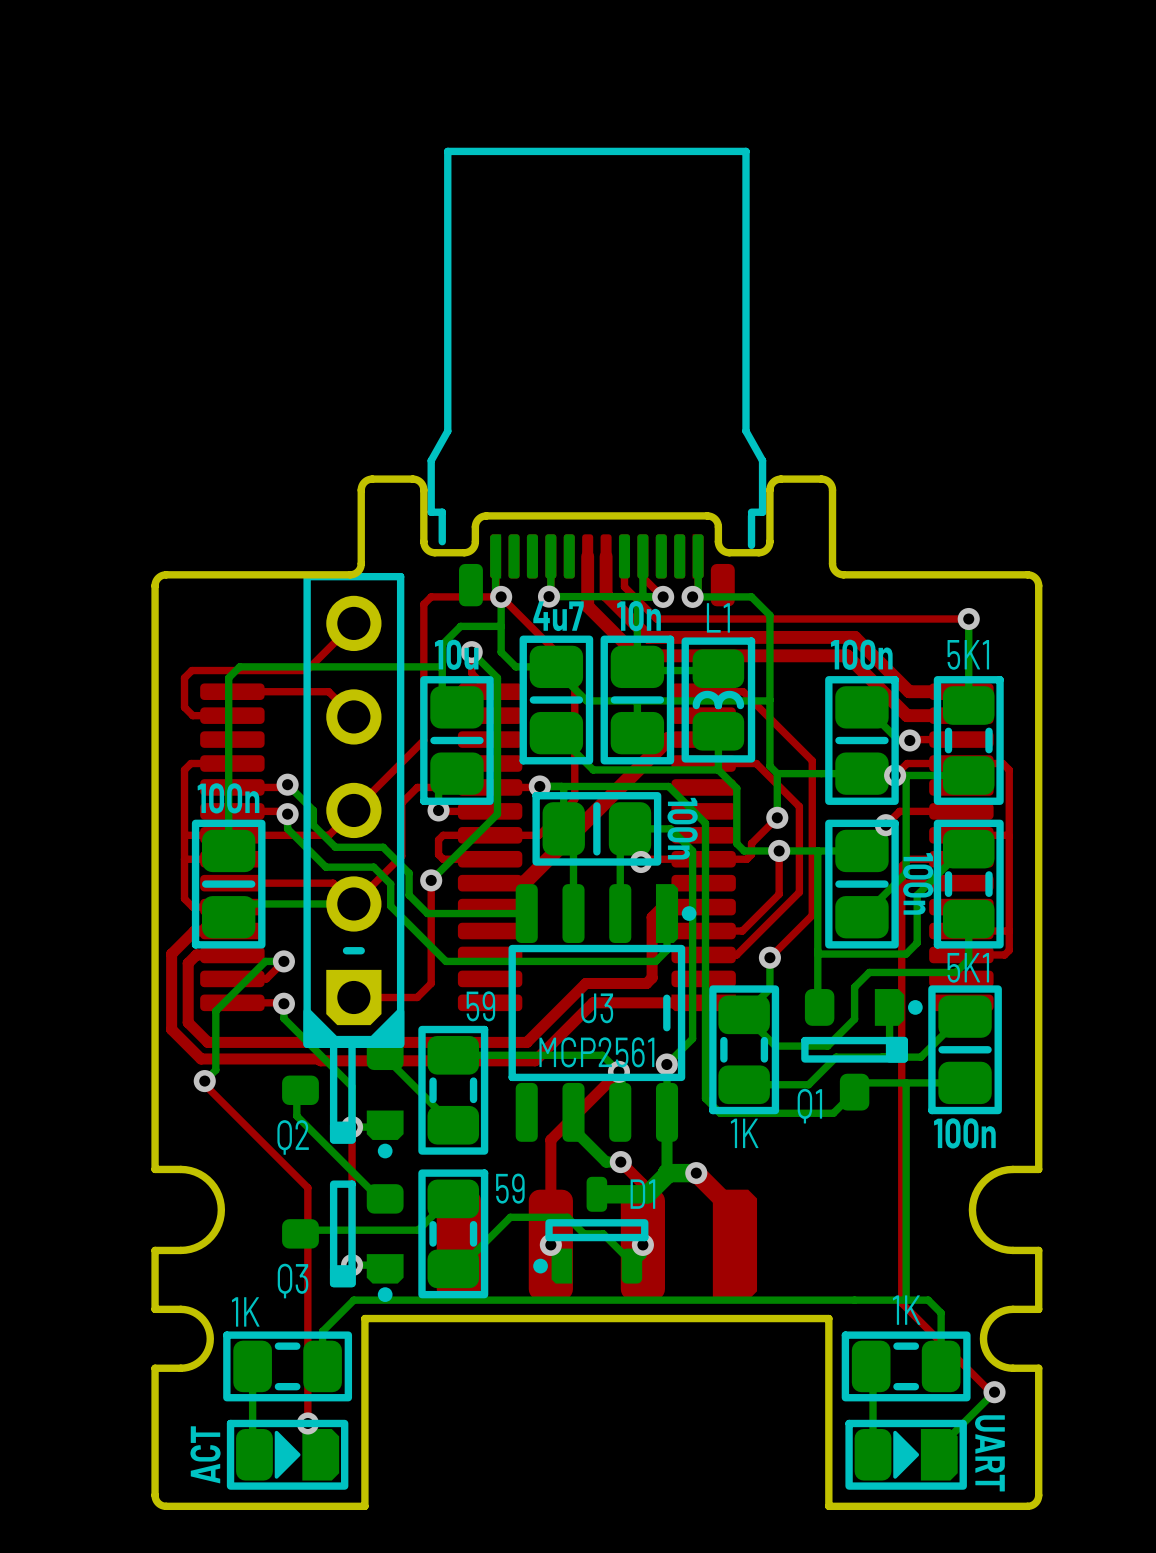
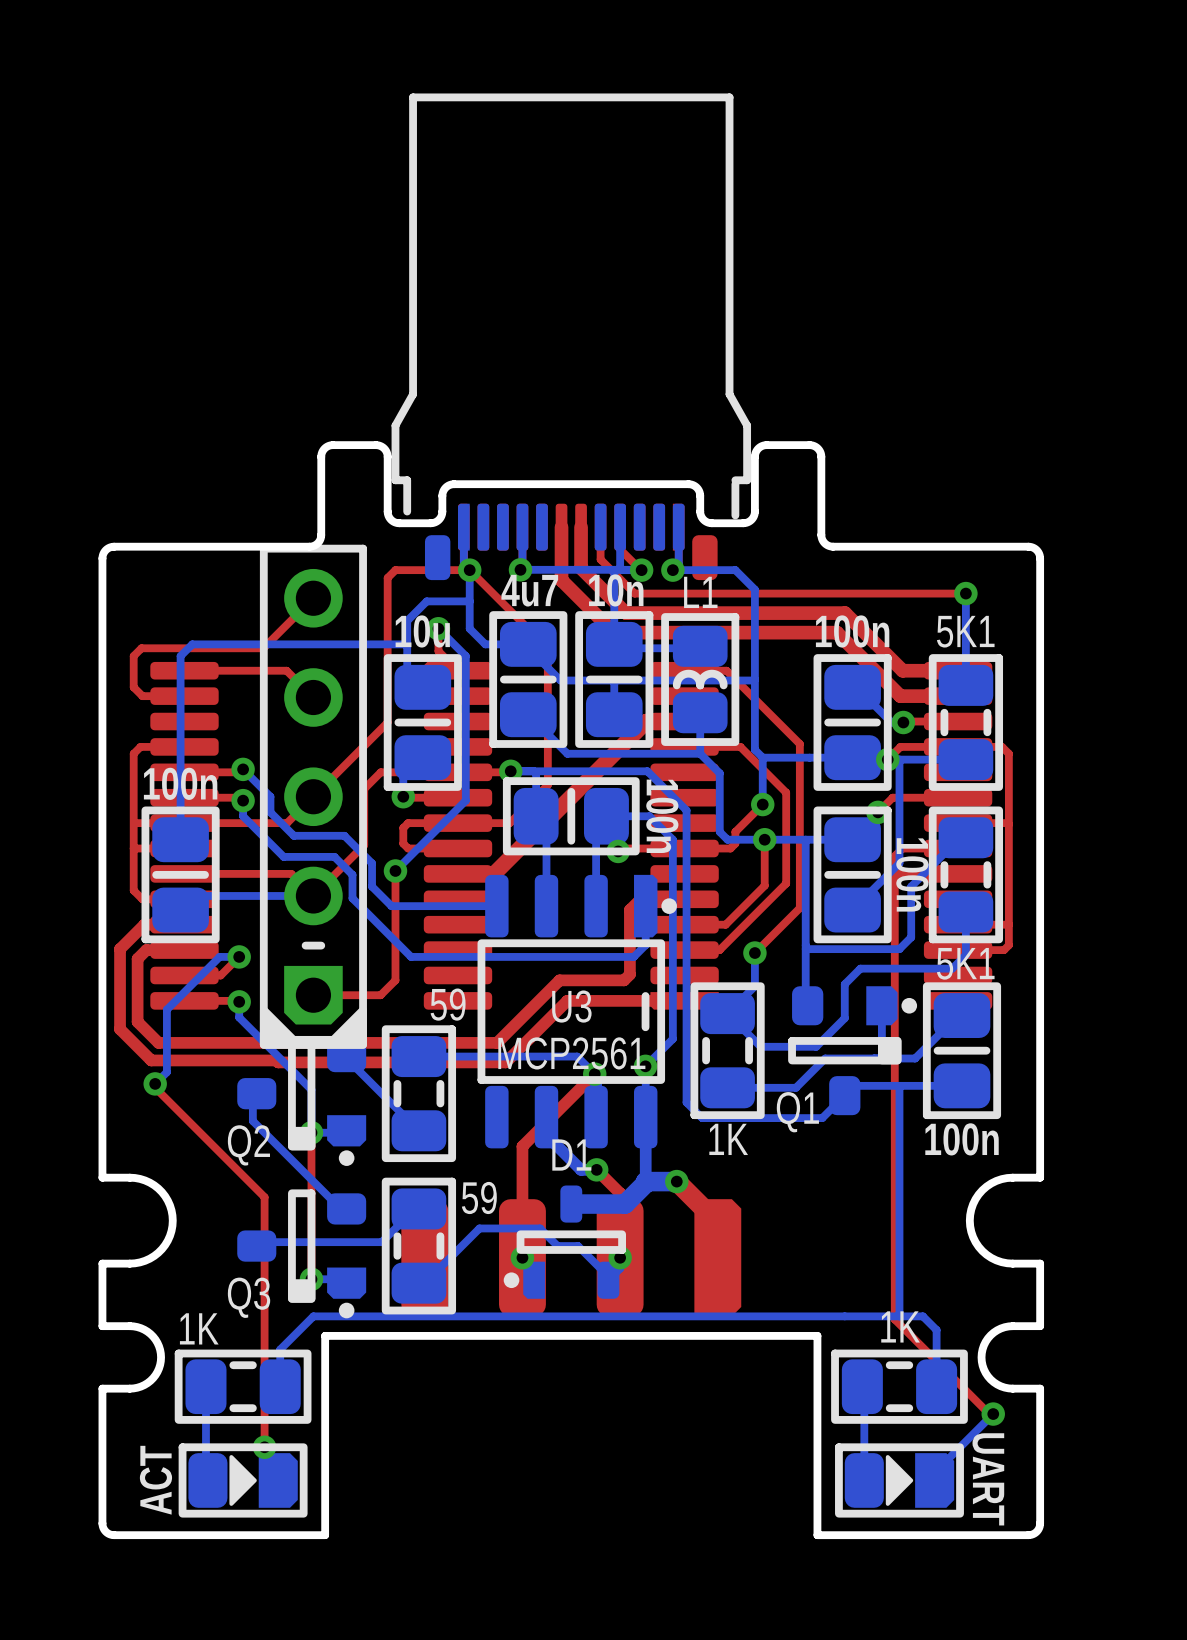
D1 name position: D1 (642, 1194) -> D1 (571, 1155)

